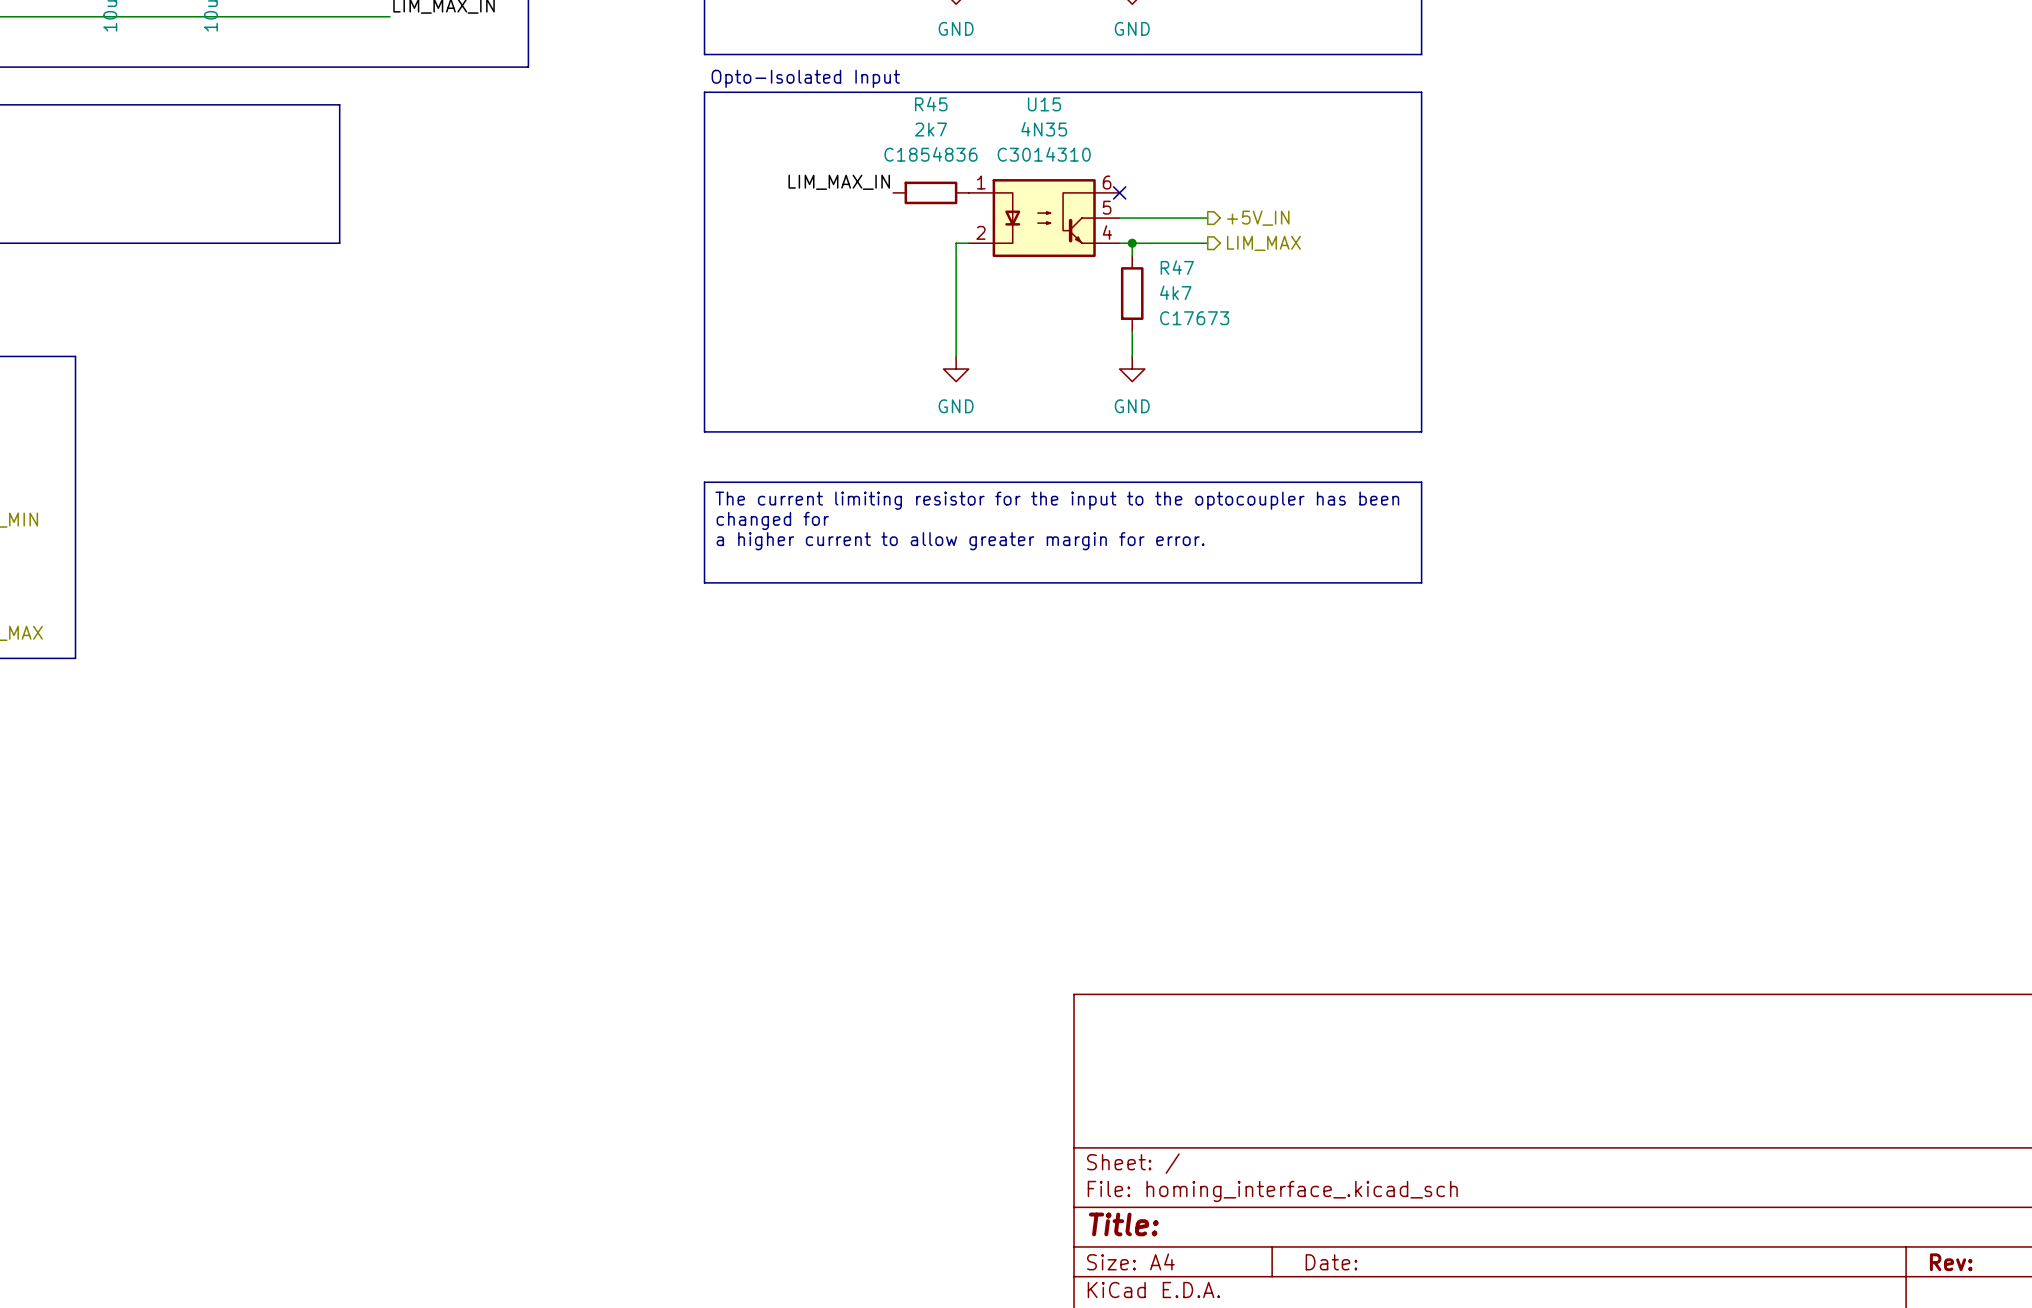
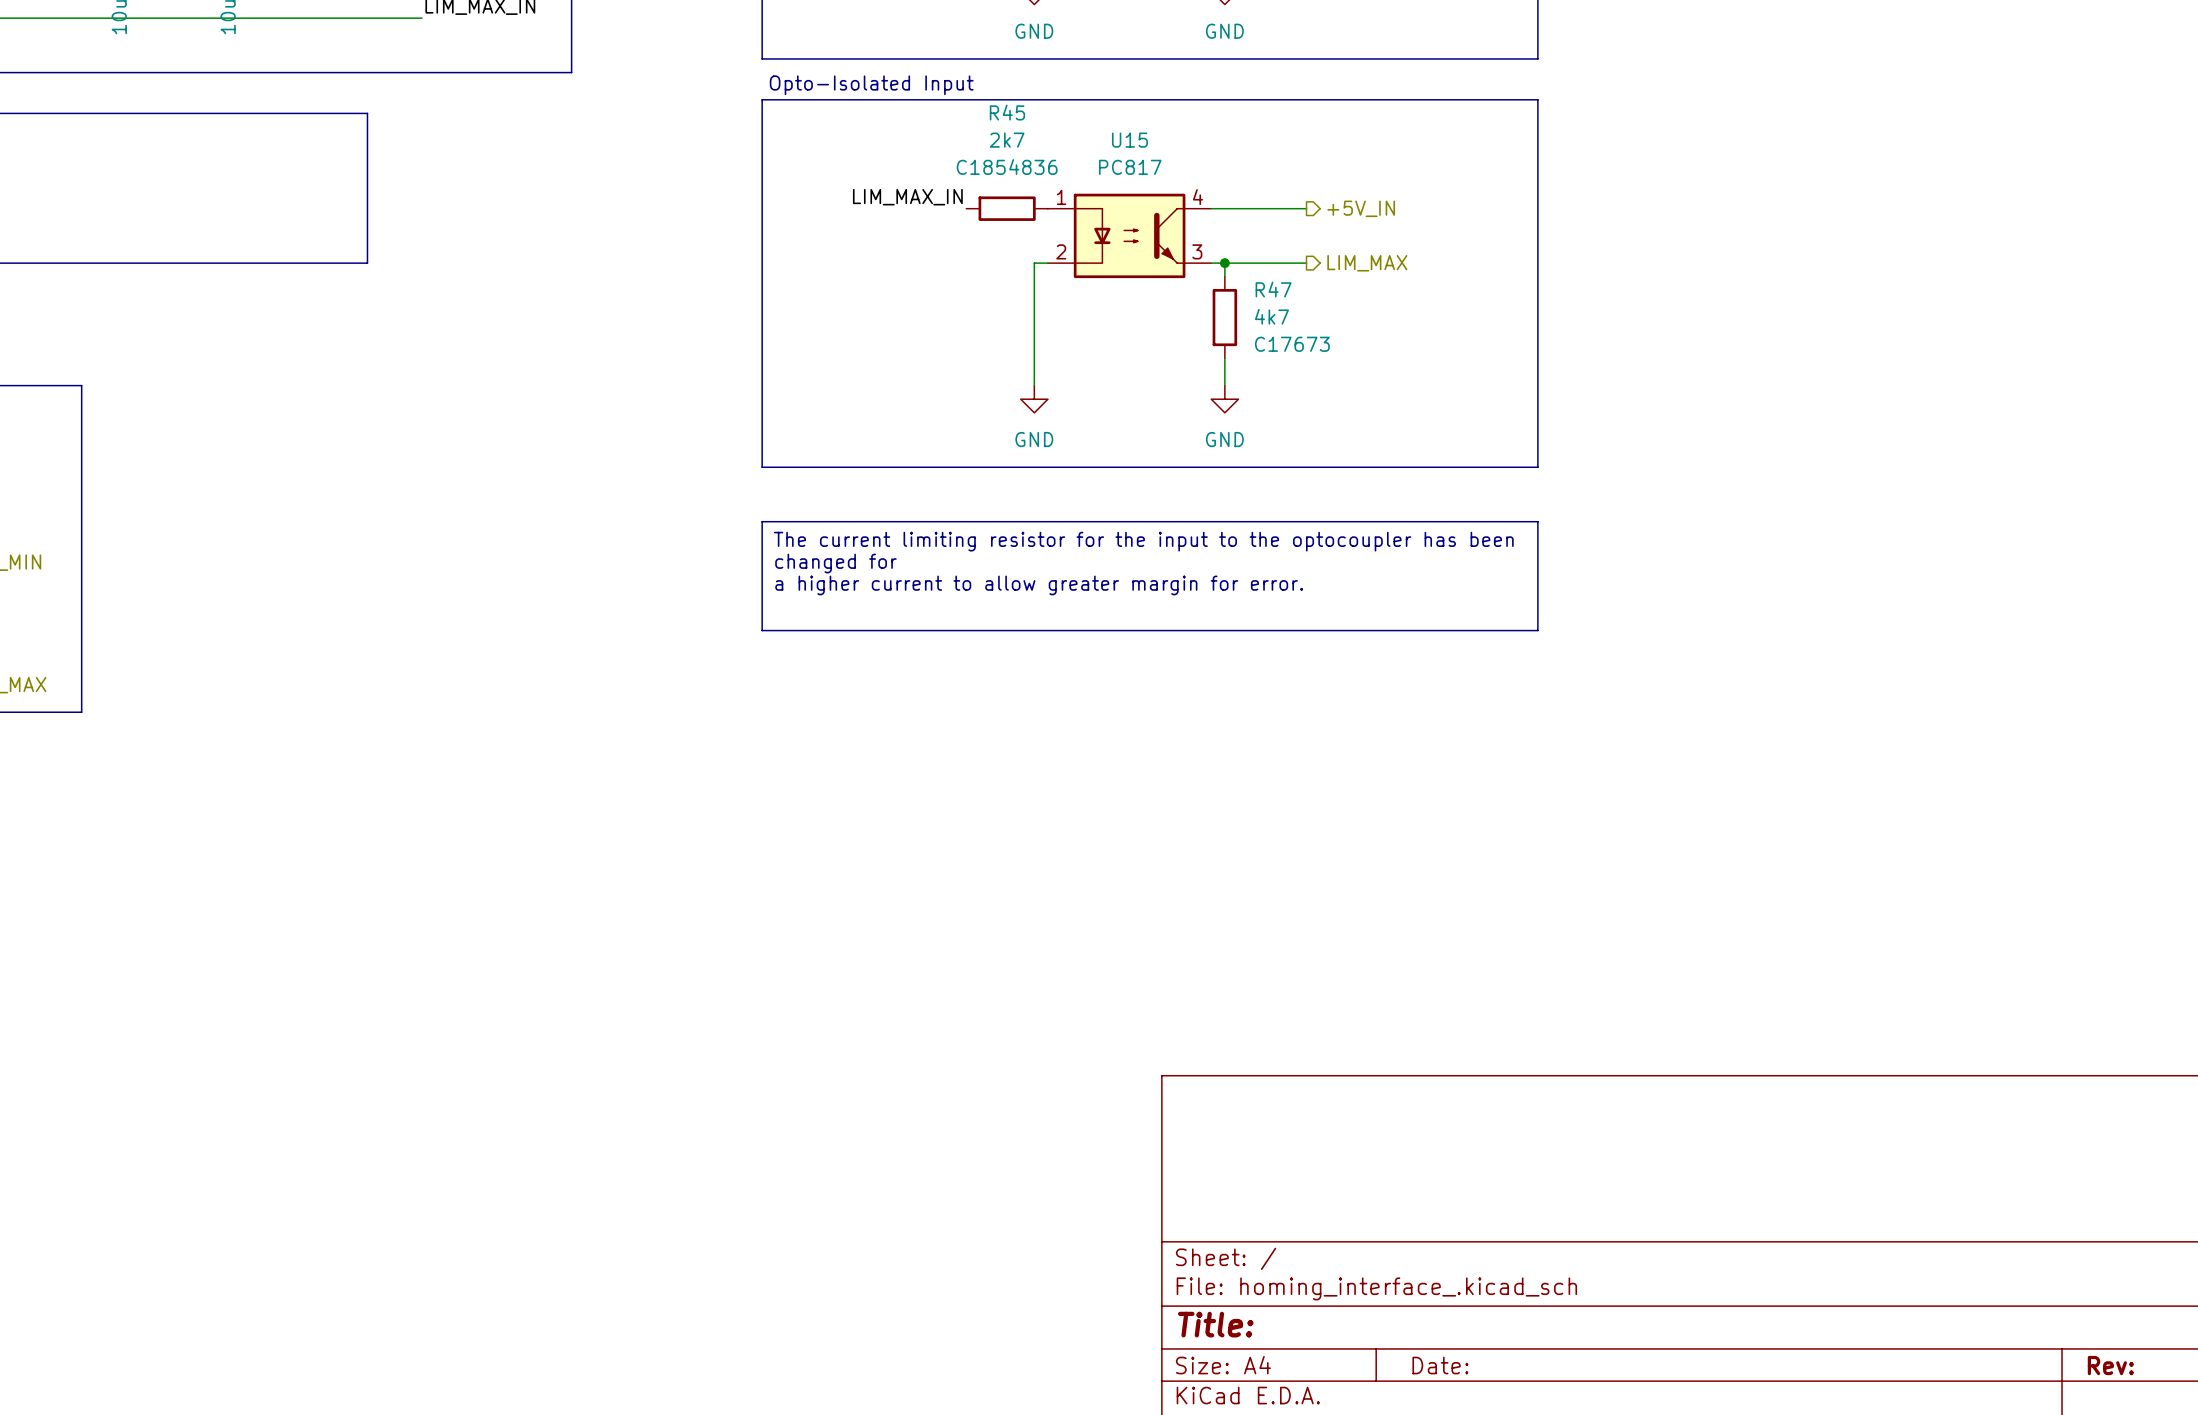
U15 name position: U15 (1044, 104) -> U15 (1129, 140)
U15 value: 4N35 (1044, 129) -> PC817 (1130, 167)
U15 text: C3014310 (1044, 154) -> none
U15 symbol: [968, 179, 1120, 258] -> [1047, 193, 1212, 279]
no-connect mark: (1119, 192) -> none
wire: (1119, 218) (1207, 218) -> (1211, 208) (1306, 208)
hierarchical label position: +5V_IN (1258, 218) -> +5V_IN (1361, 208)

